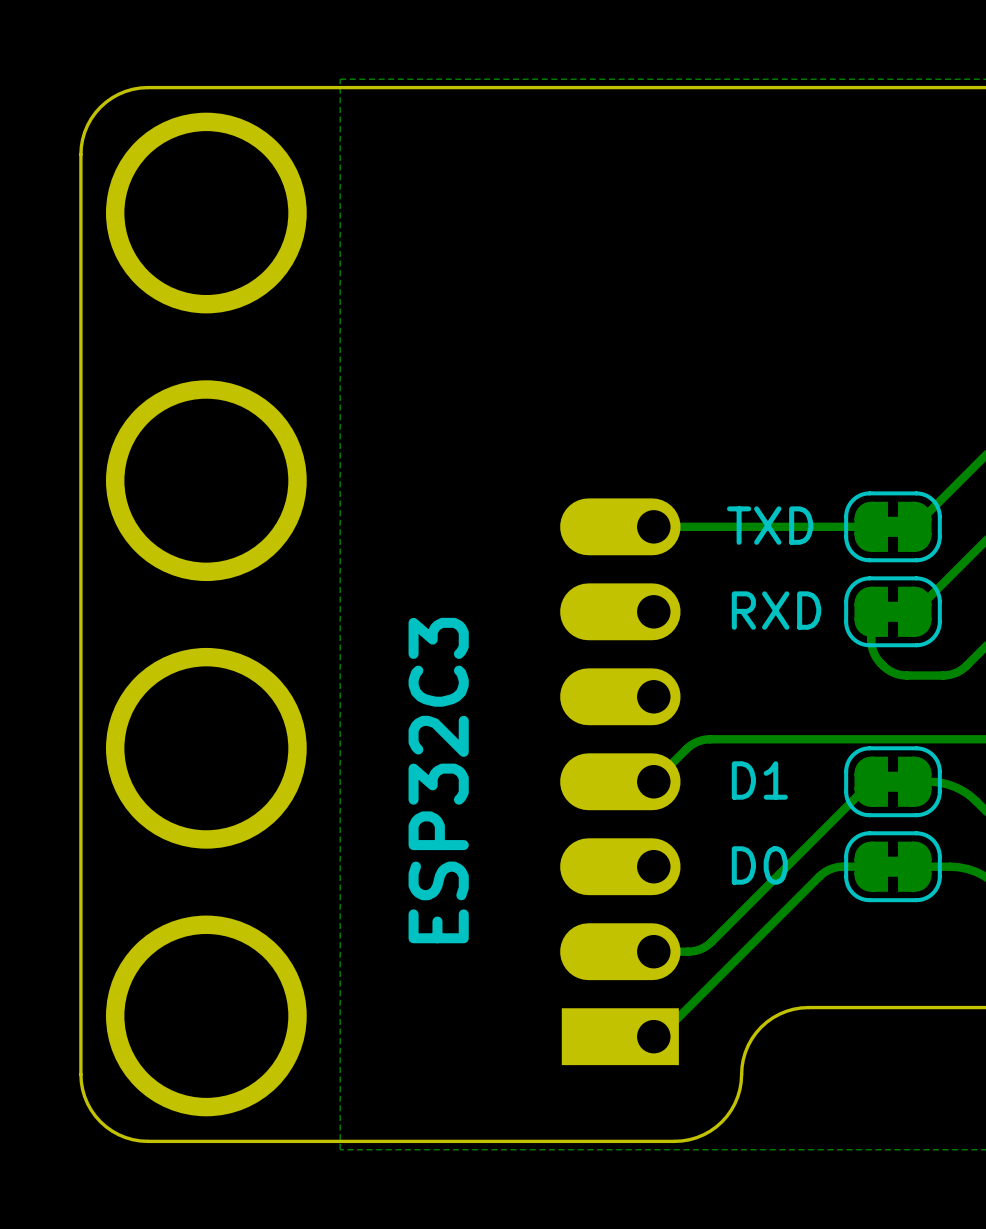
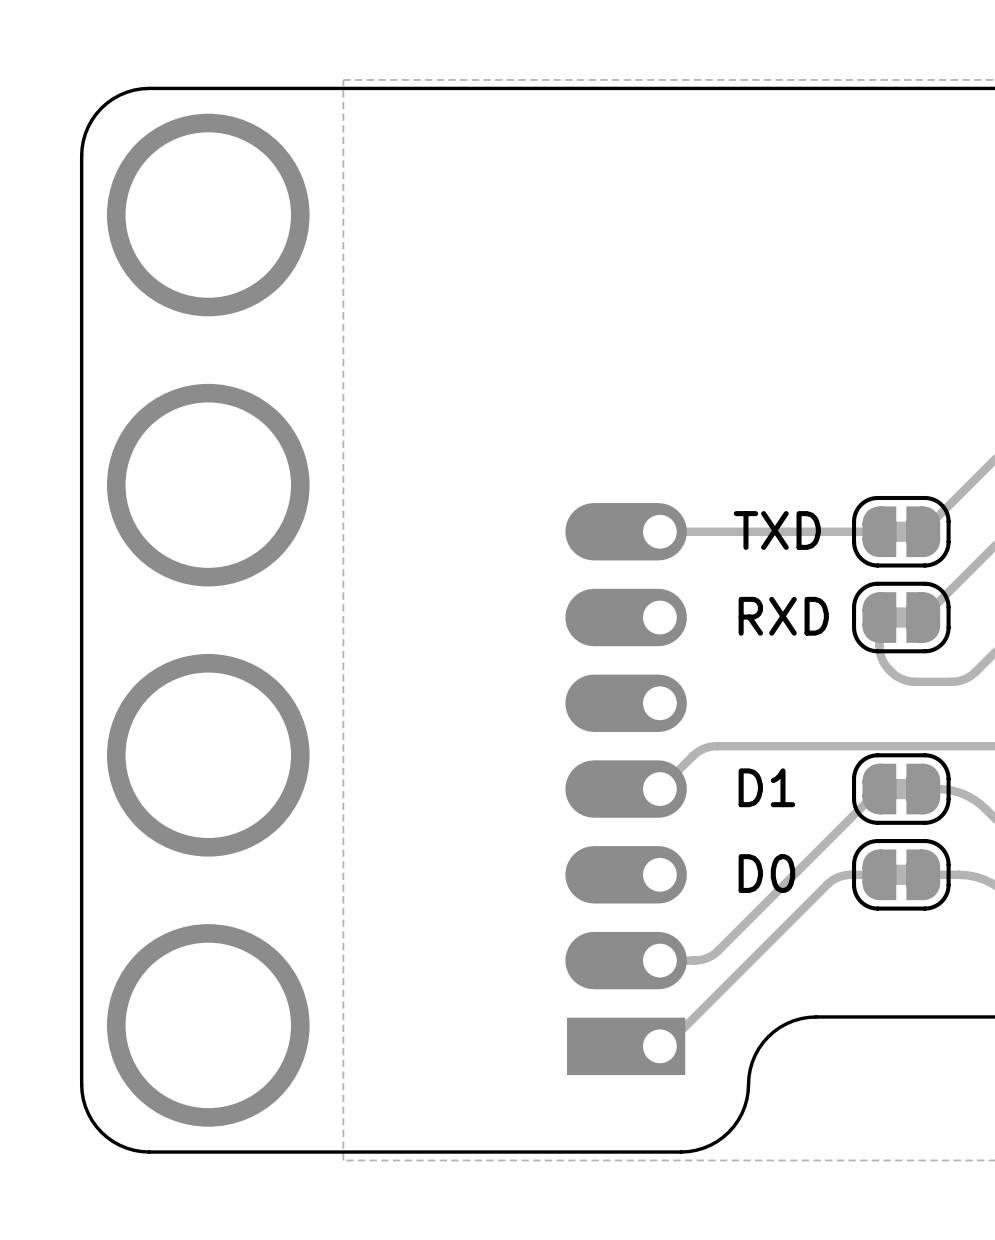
text: ESP32C3 (438, 780) -> none

